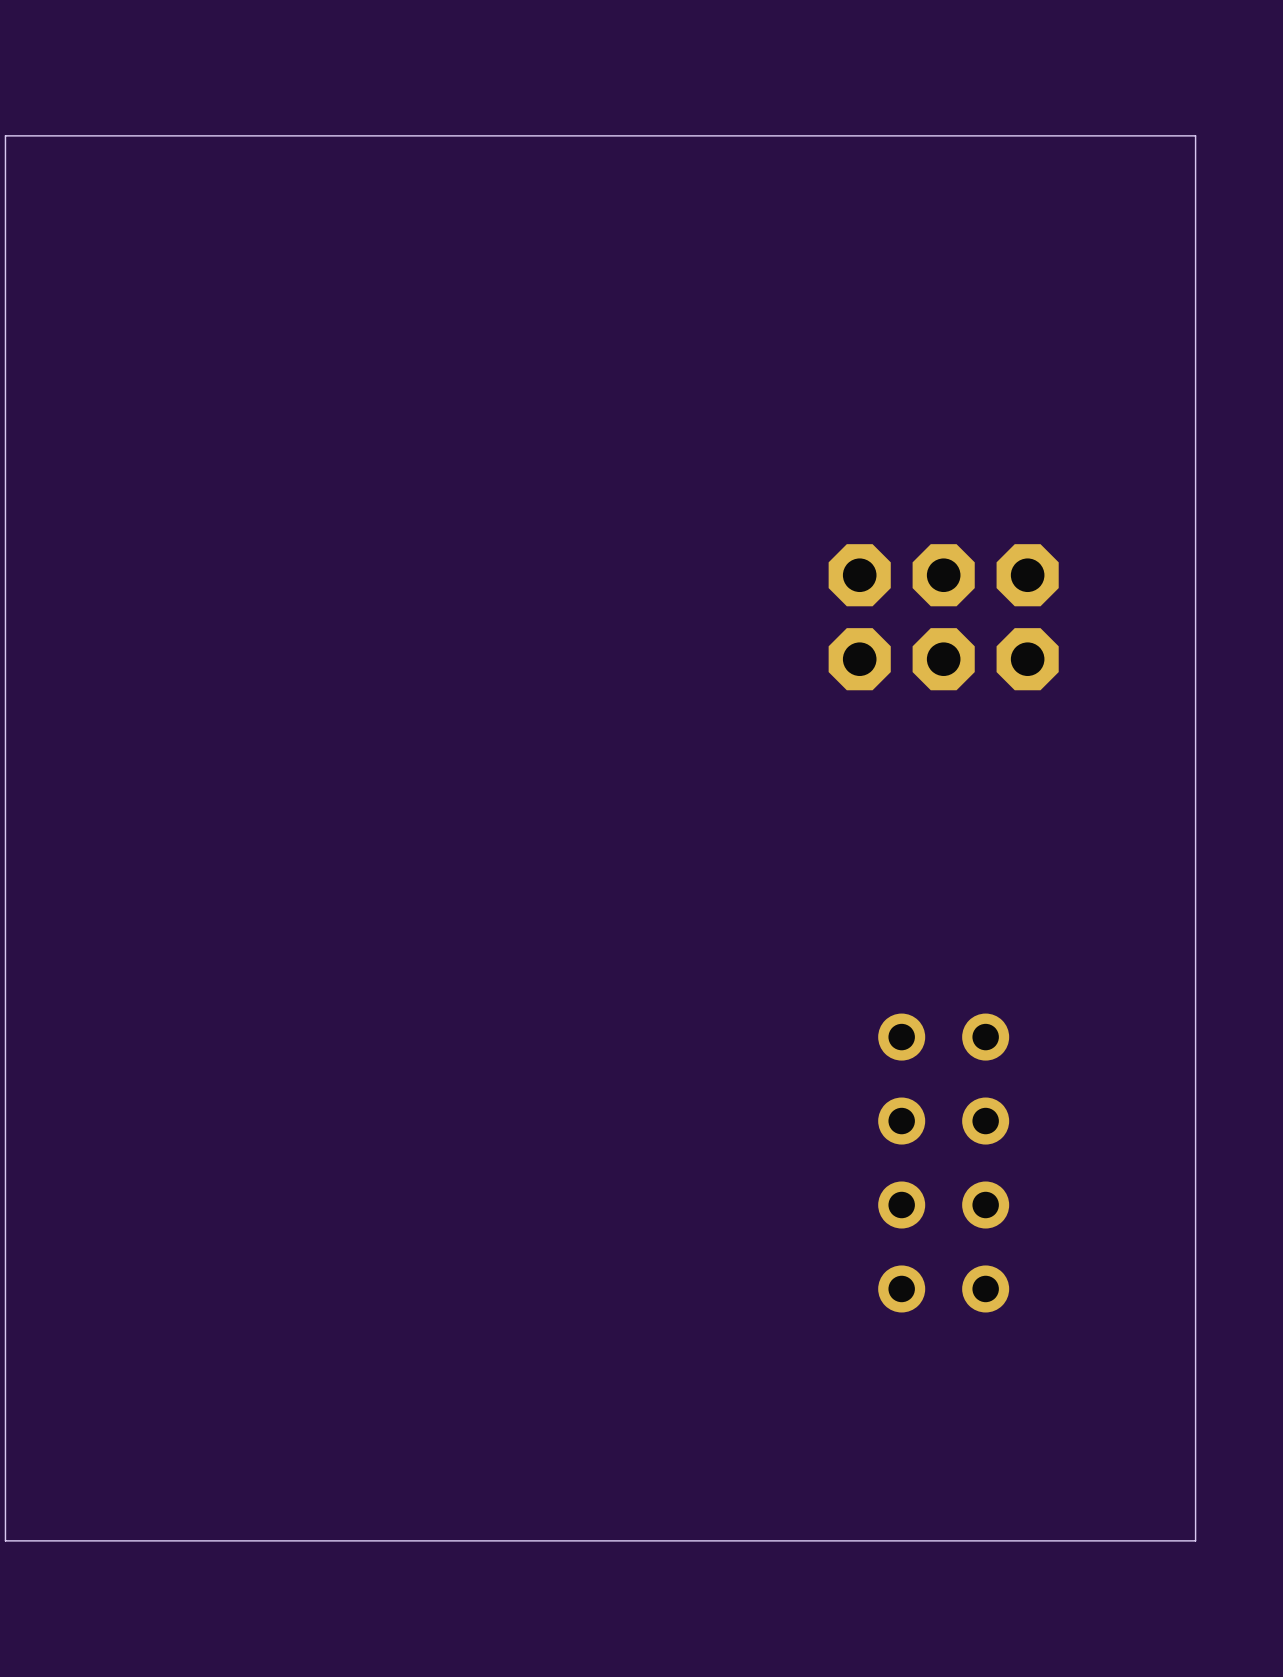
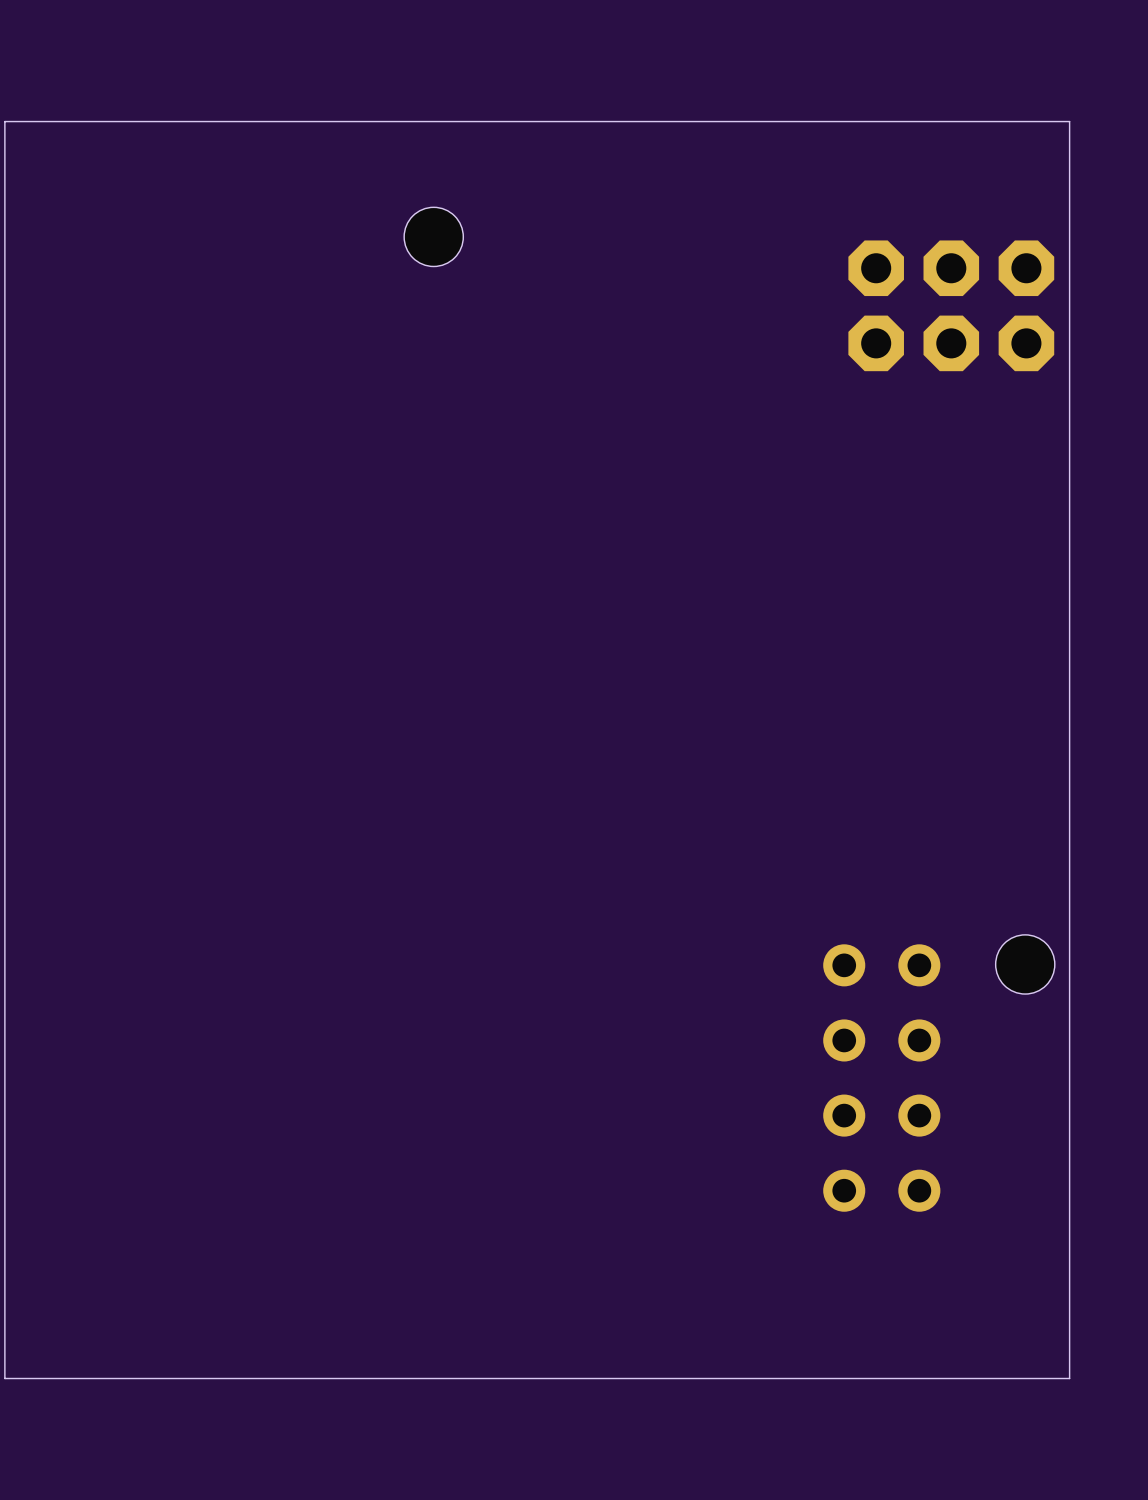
hole: none -> (433, 236)
part position: (943, 617) -> (951, 305)
hole: none -> (1025, 964)
part position: (943, 1163) -> (881, 1078)

